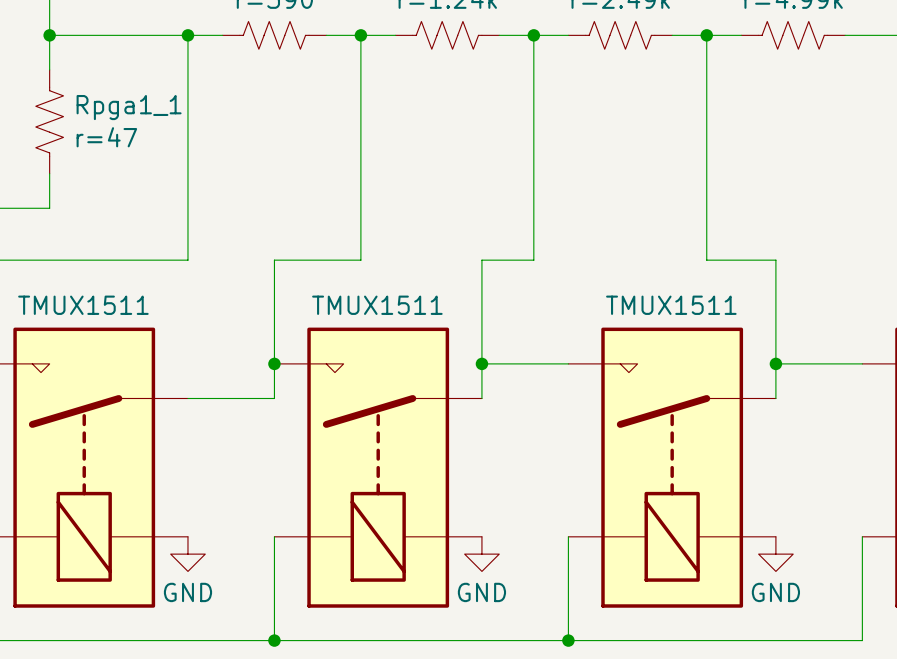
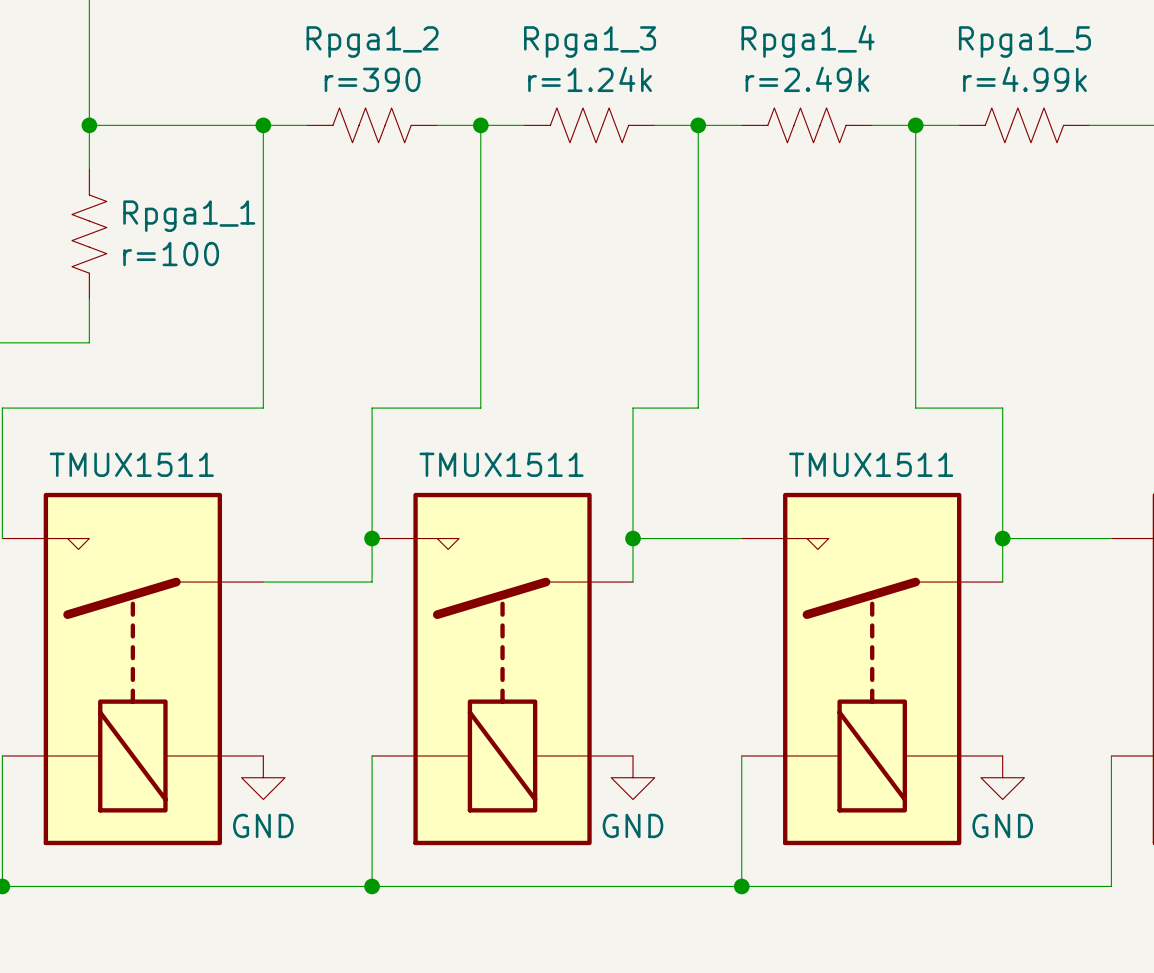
Rpga1_1 value: r=47 (106, 137) -> r=100 (171, 254)

